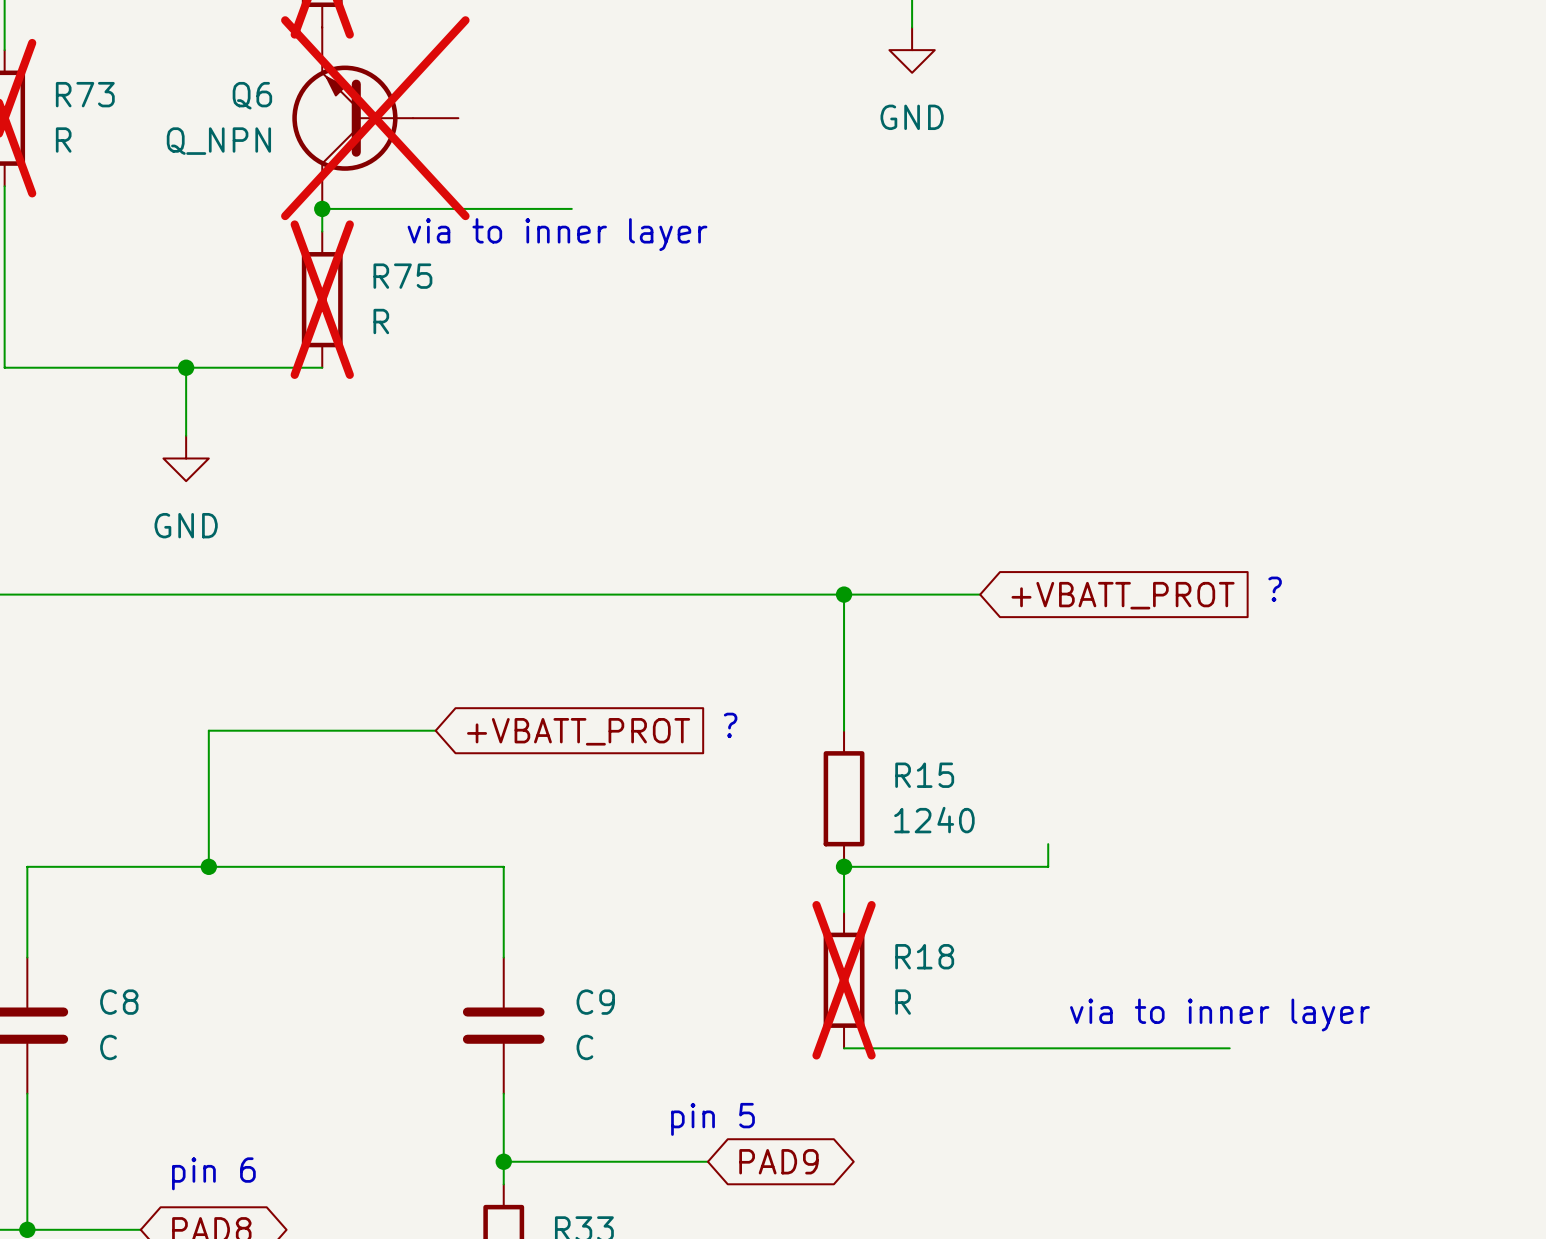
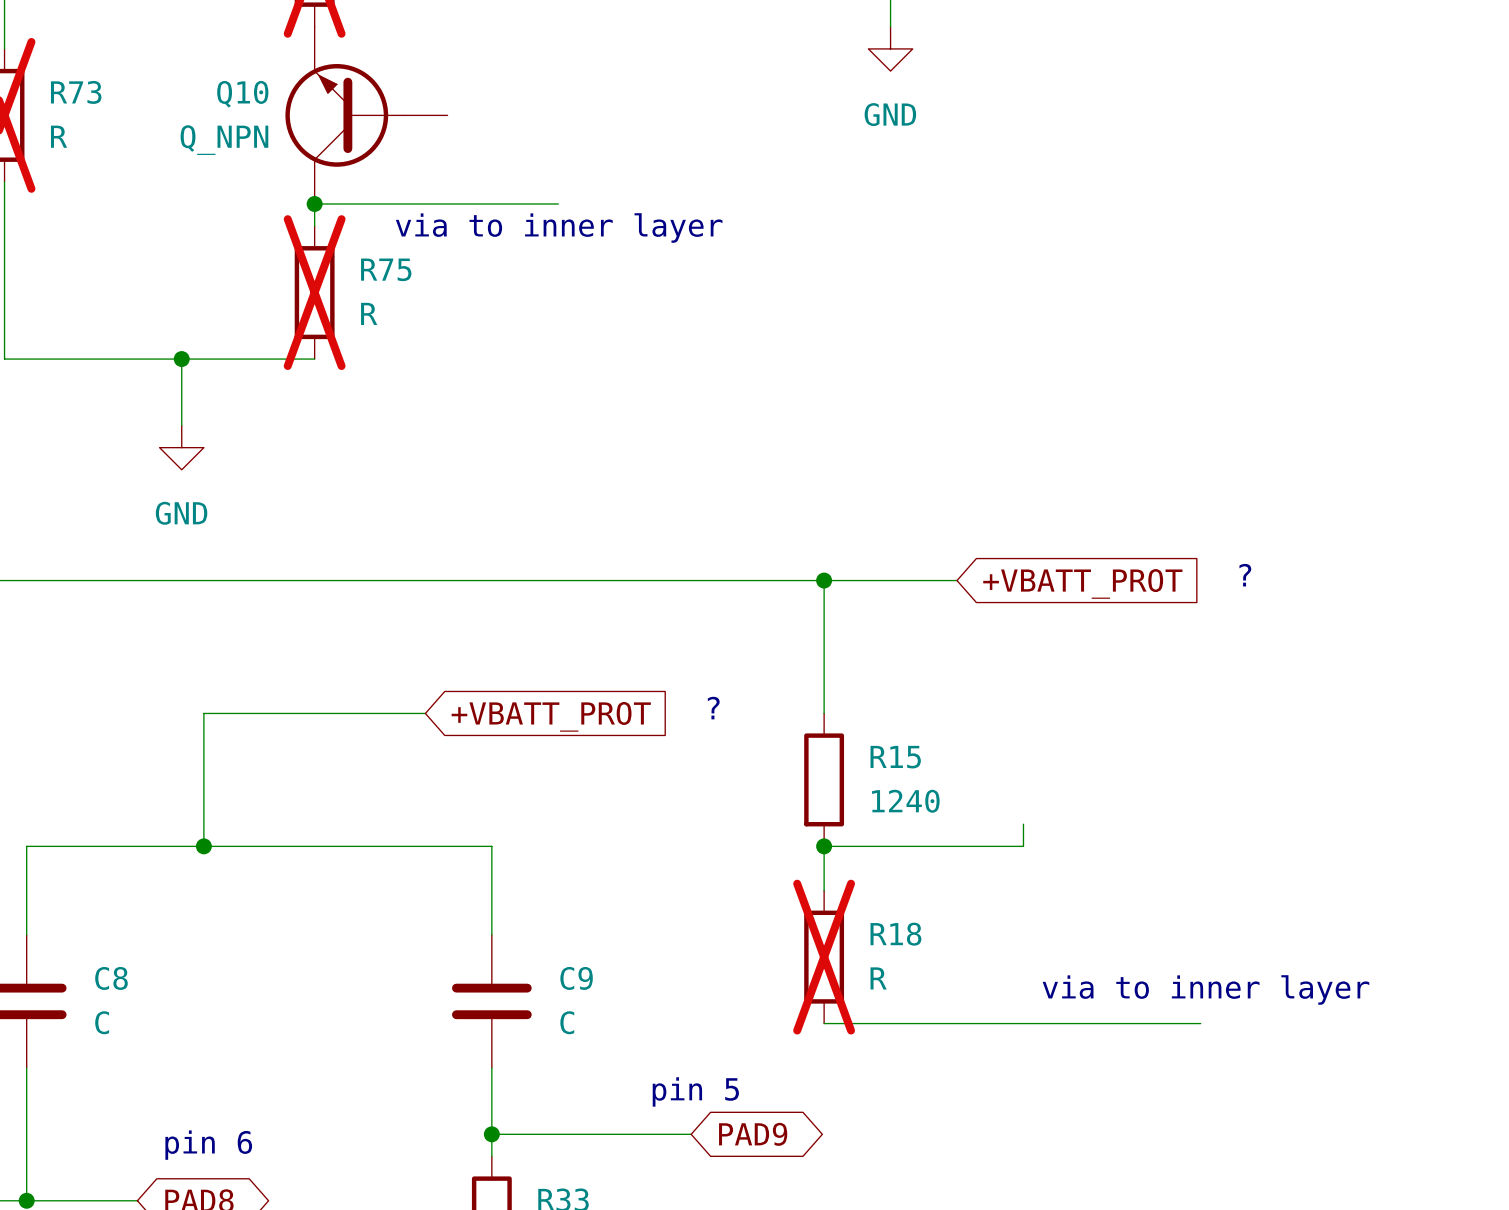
Q6 name: Q6 (252, 95) -> Q10 (242, 94)
Q6 do-not-place cross: (375, 118) -> none

